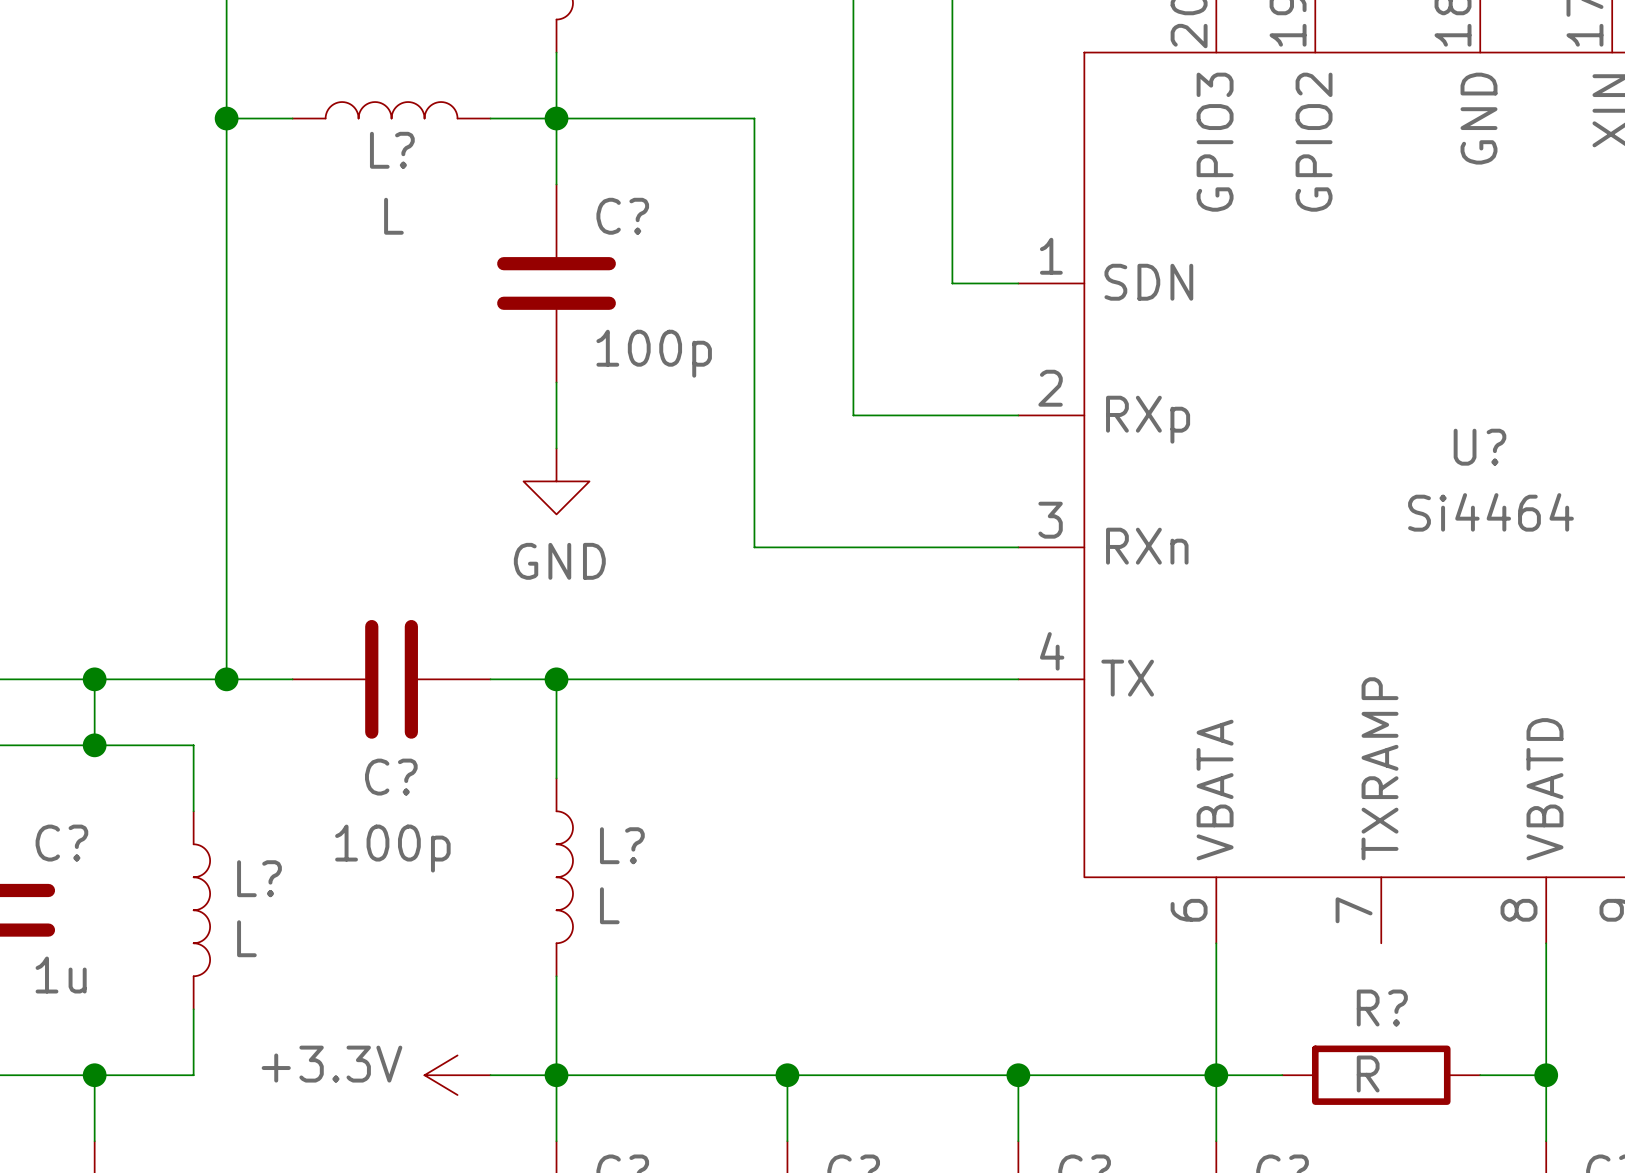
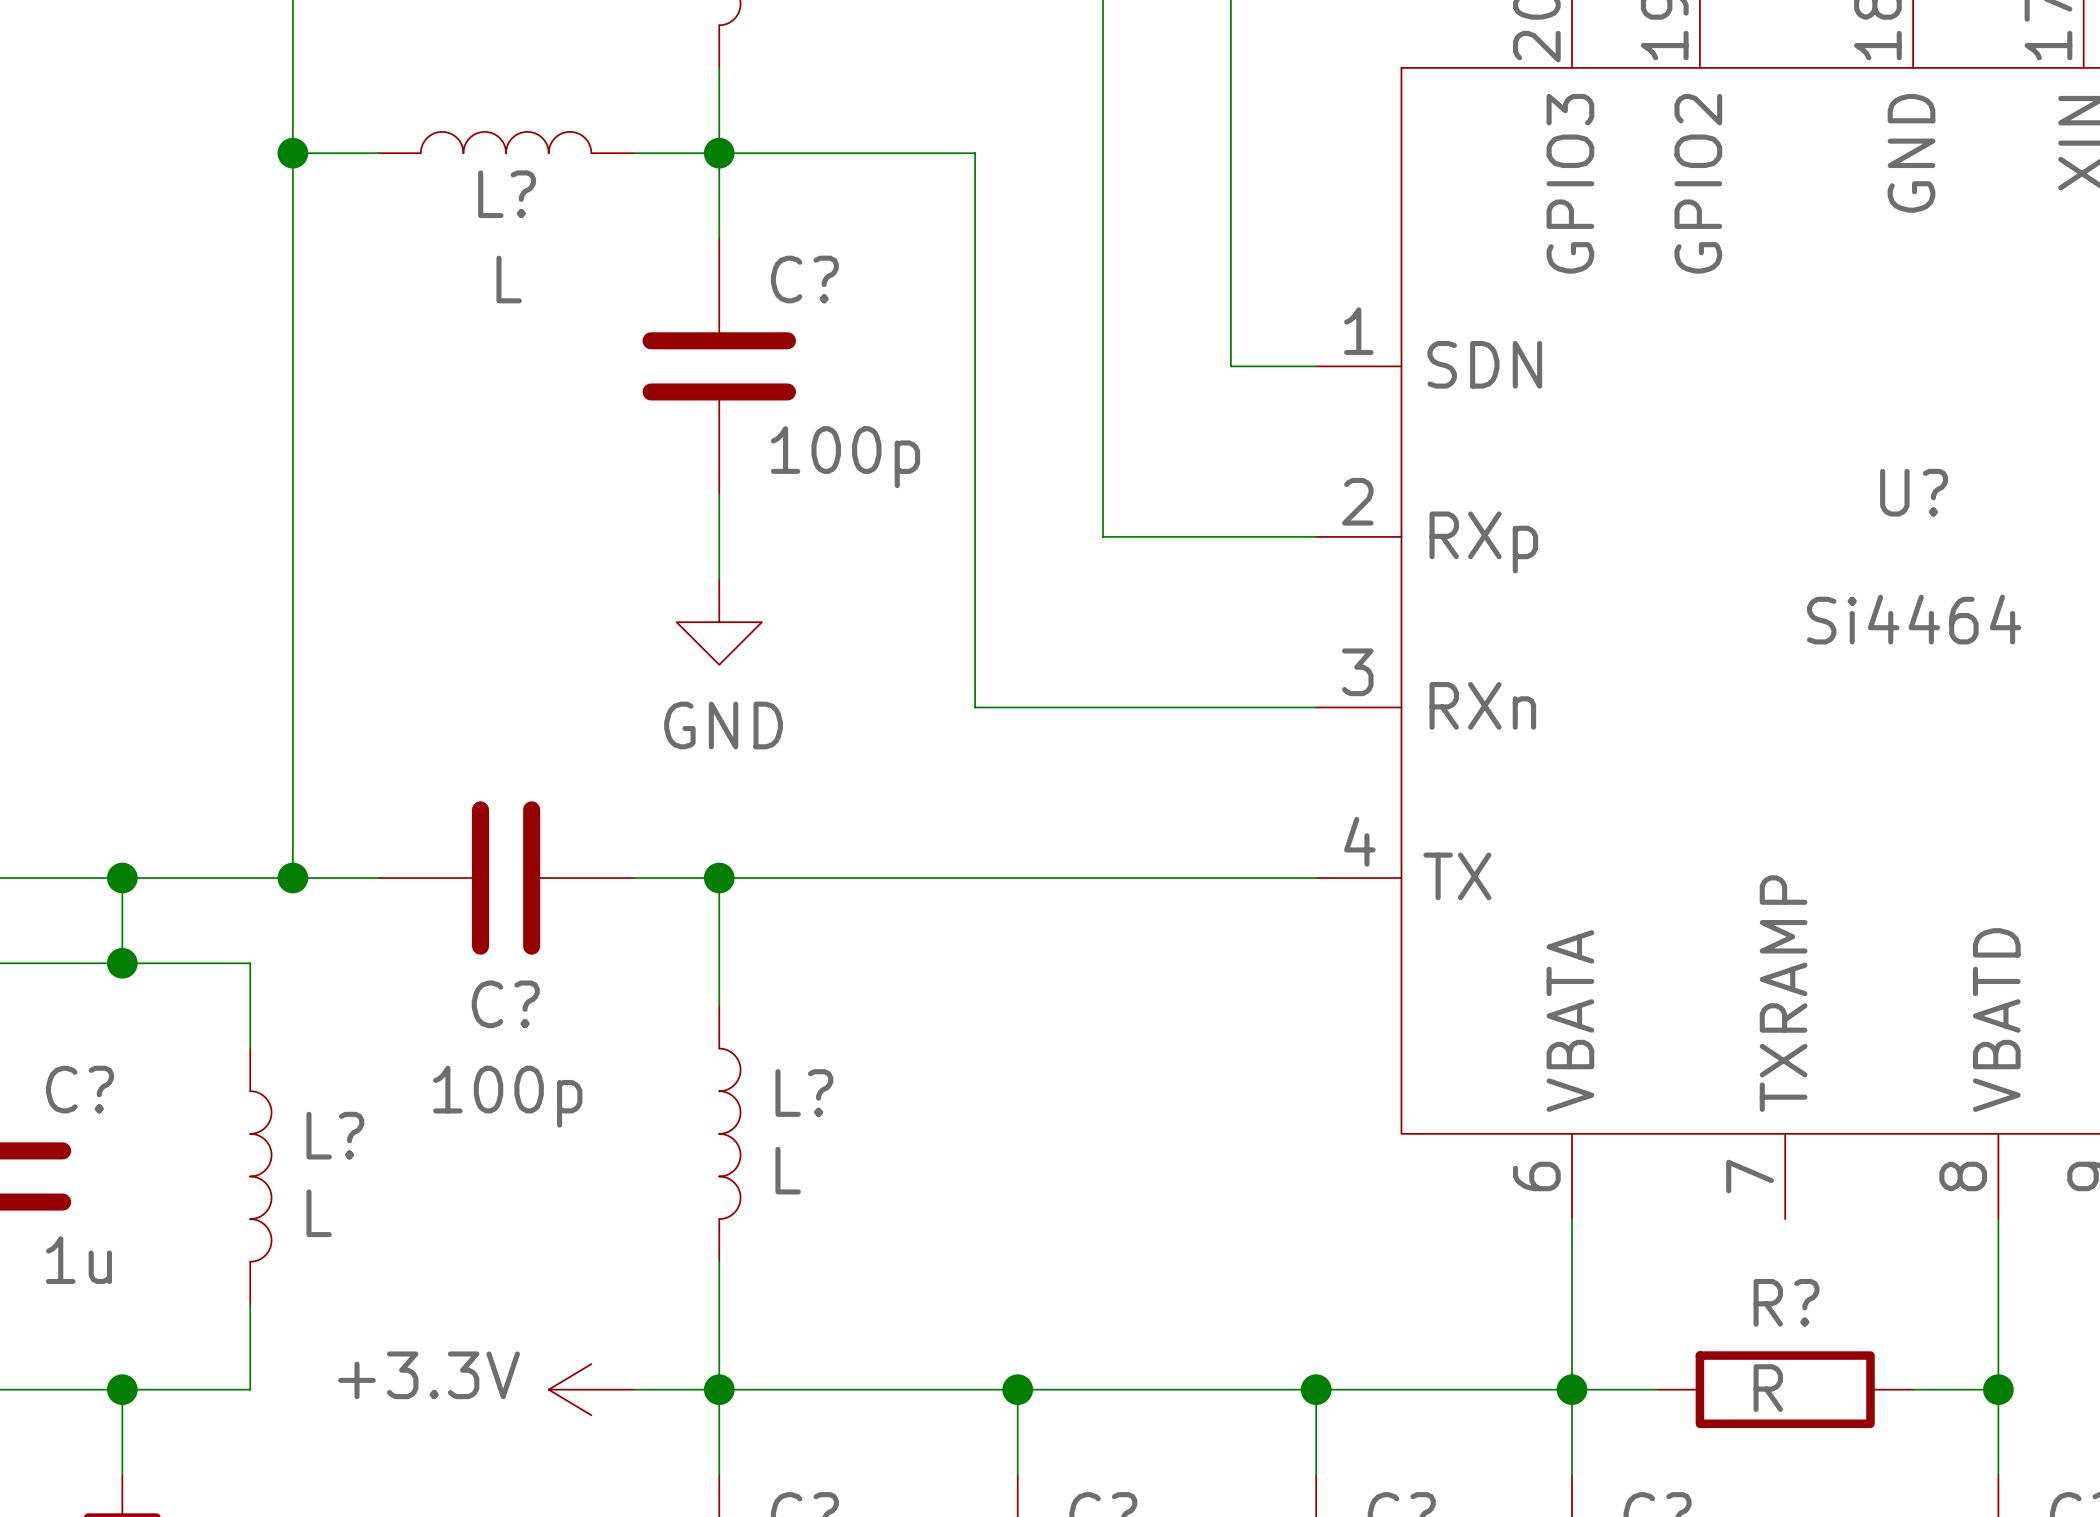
U? name position: U? (1479, 447) -> U? (1914, 492)
U? value position: Si4464 (1490, 512) -> Si4464 (1914, 619)

